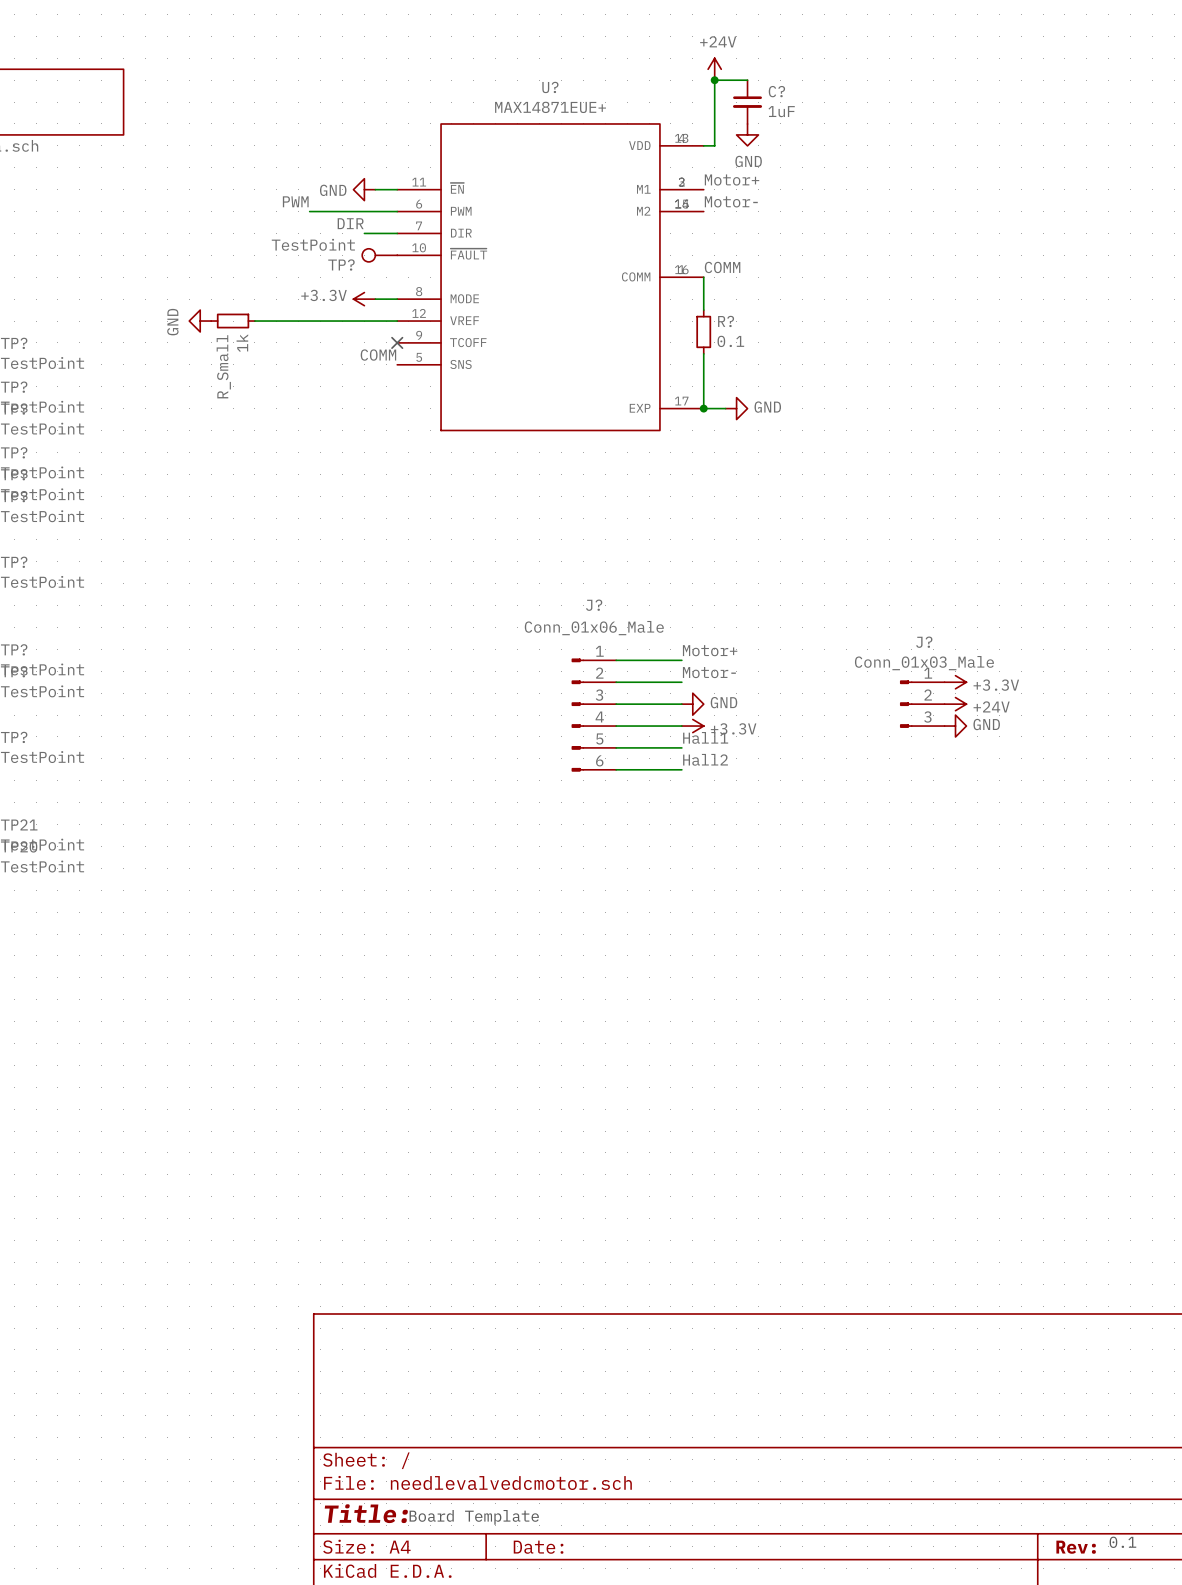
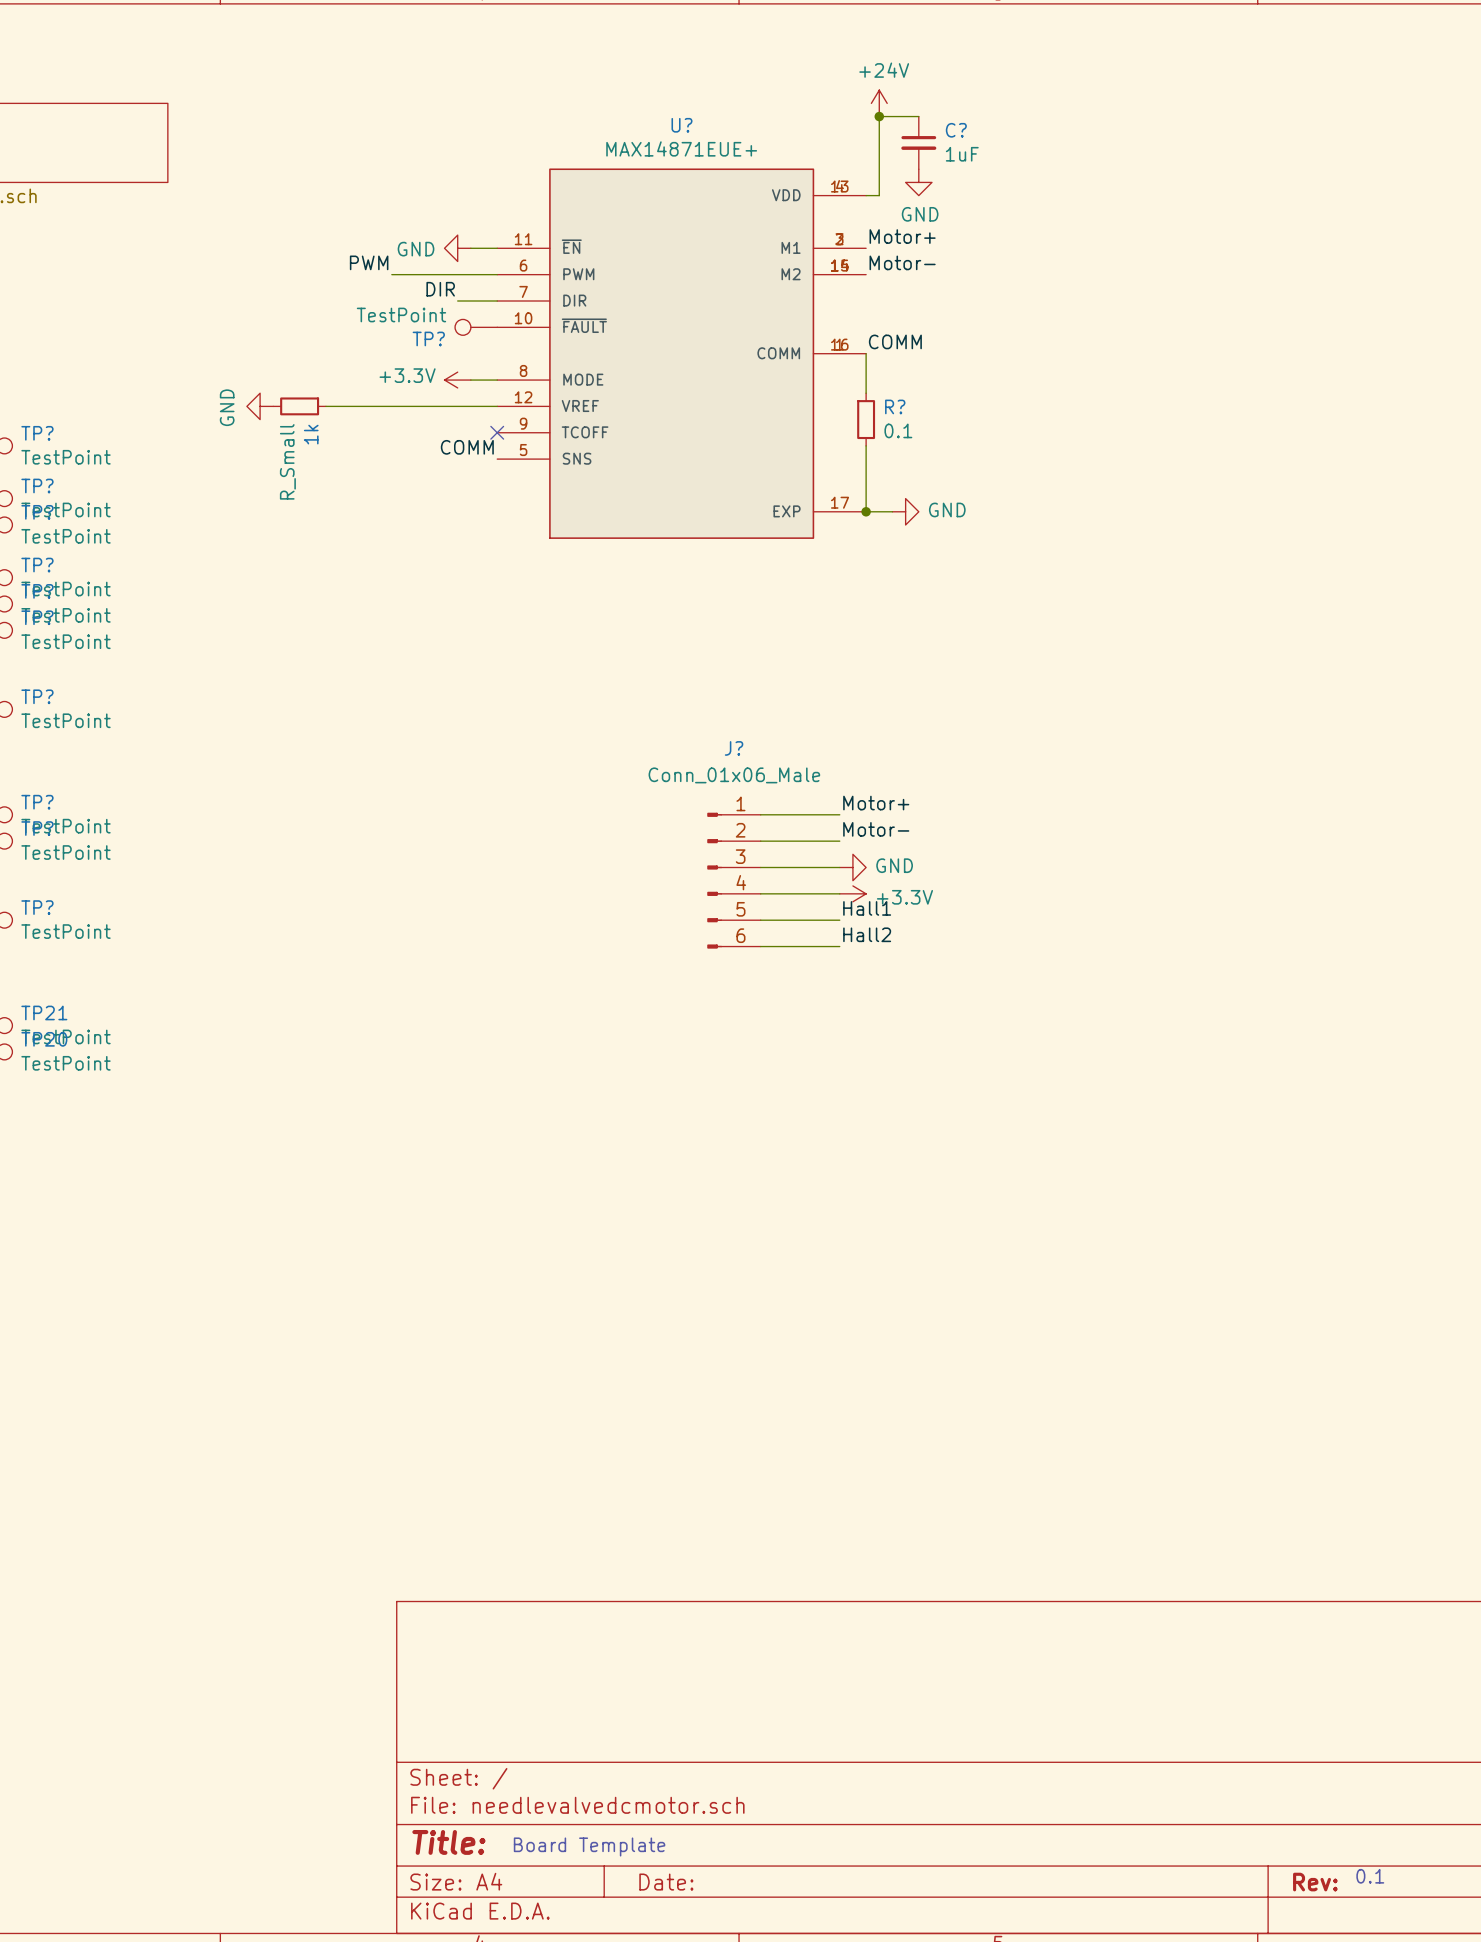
power symbol: +3.3V (955, 682) -> none
J?: Conn_01x03_Male (922, 704) -> none
power symbol: +24V (955, 704) -> none
power symbol: GND (955, 726) -> none

